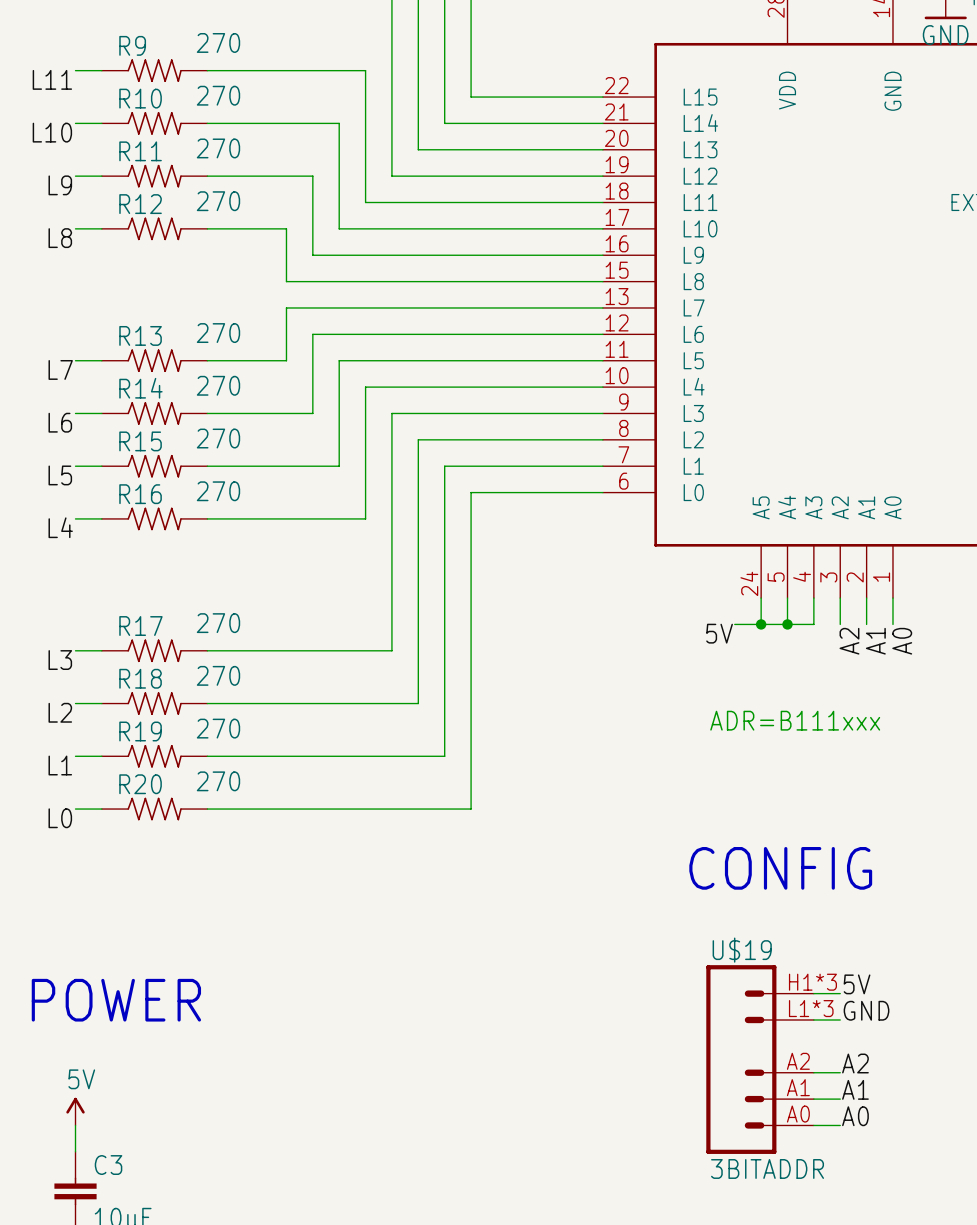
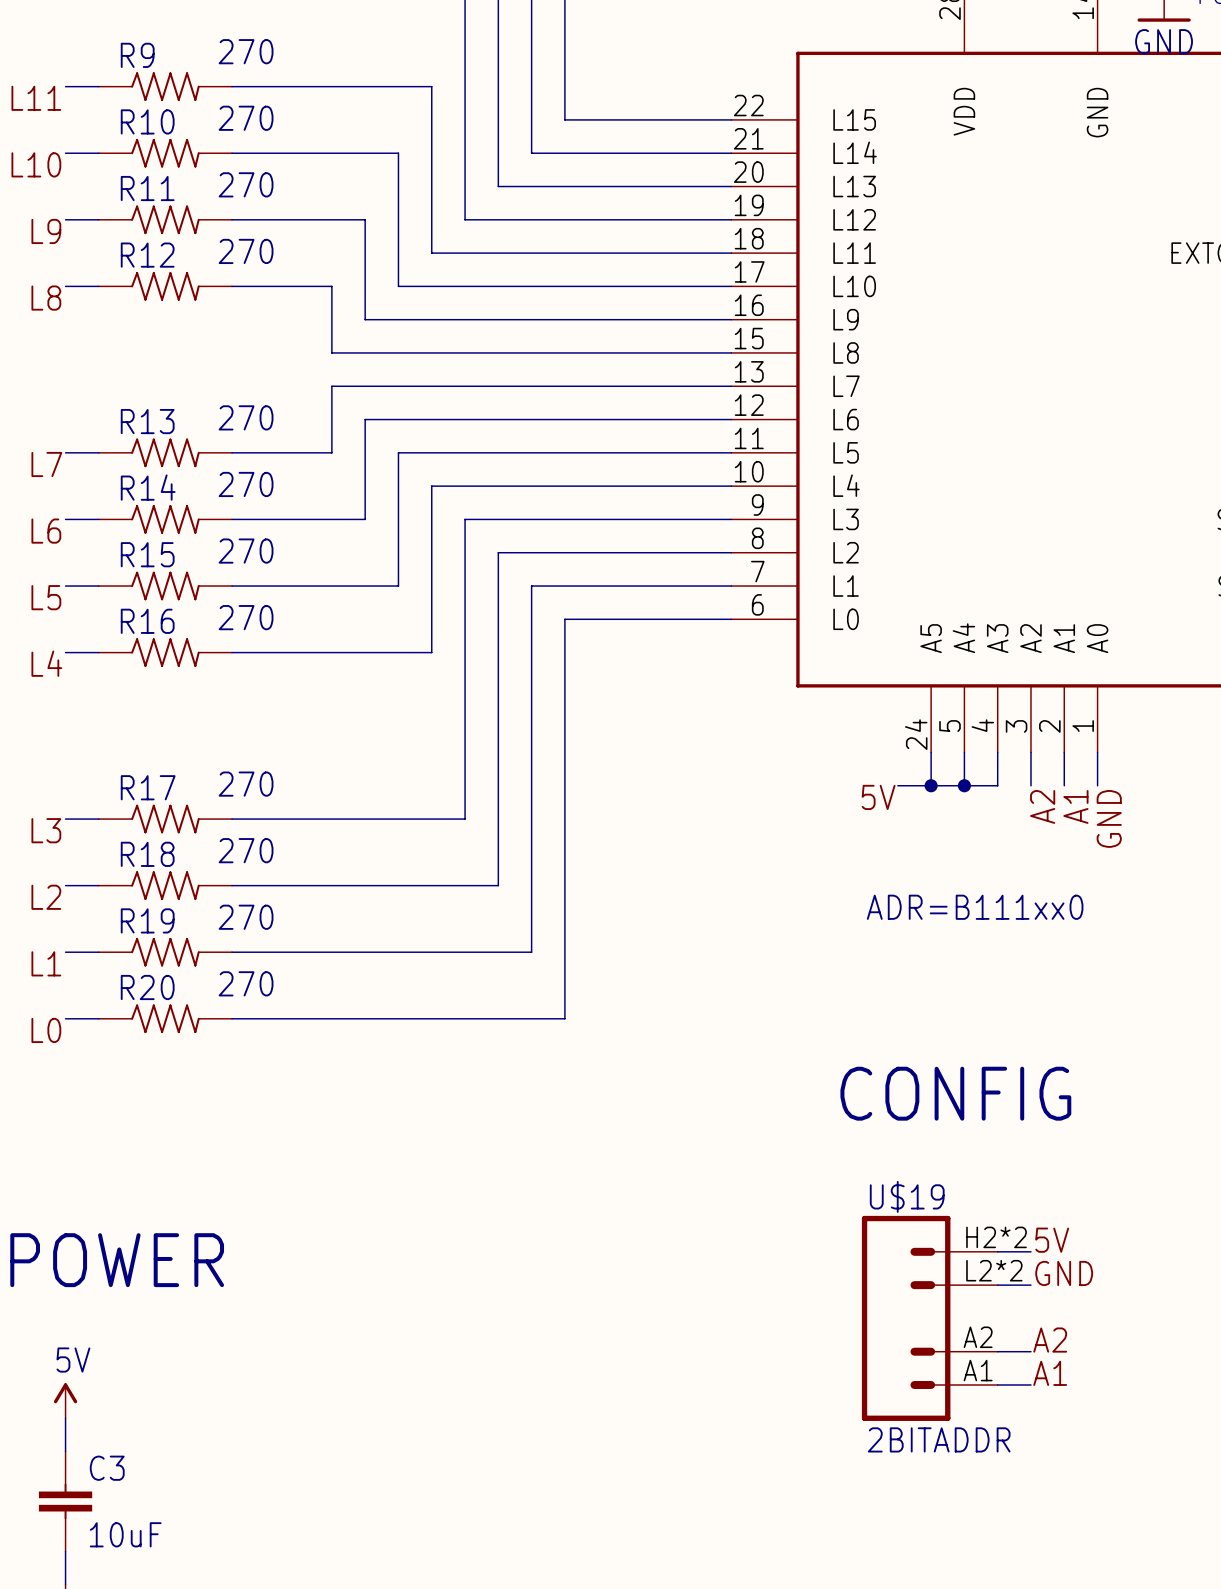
label: A0 (902, 641) -> GND (1109, 818)
text: ADR=B111xxx (795, 720) -> ADR=B111xx0 (975, 907)
U$19 symbol: [706, 965, 814, 1154] -> [861, 1215, 998, 1421]
label: A0 (855, 1116) -> none
wire: (813, 1125) (840, 1125) -> none
U$19 value: 3BITADDR (767, 1168) -> 2BITADDR (939, 1439)

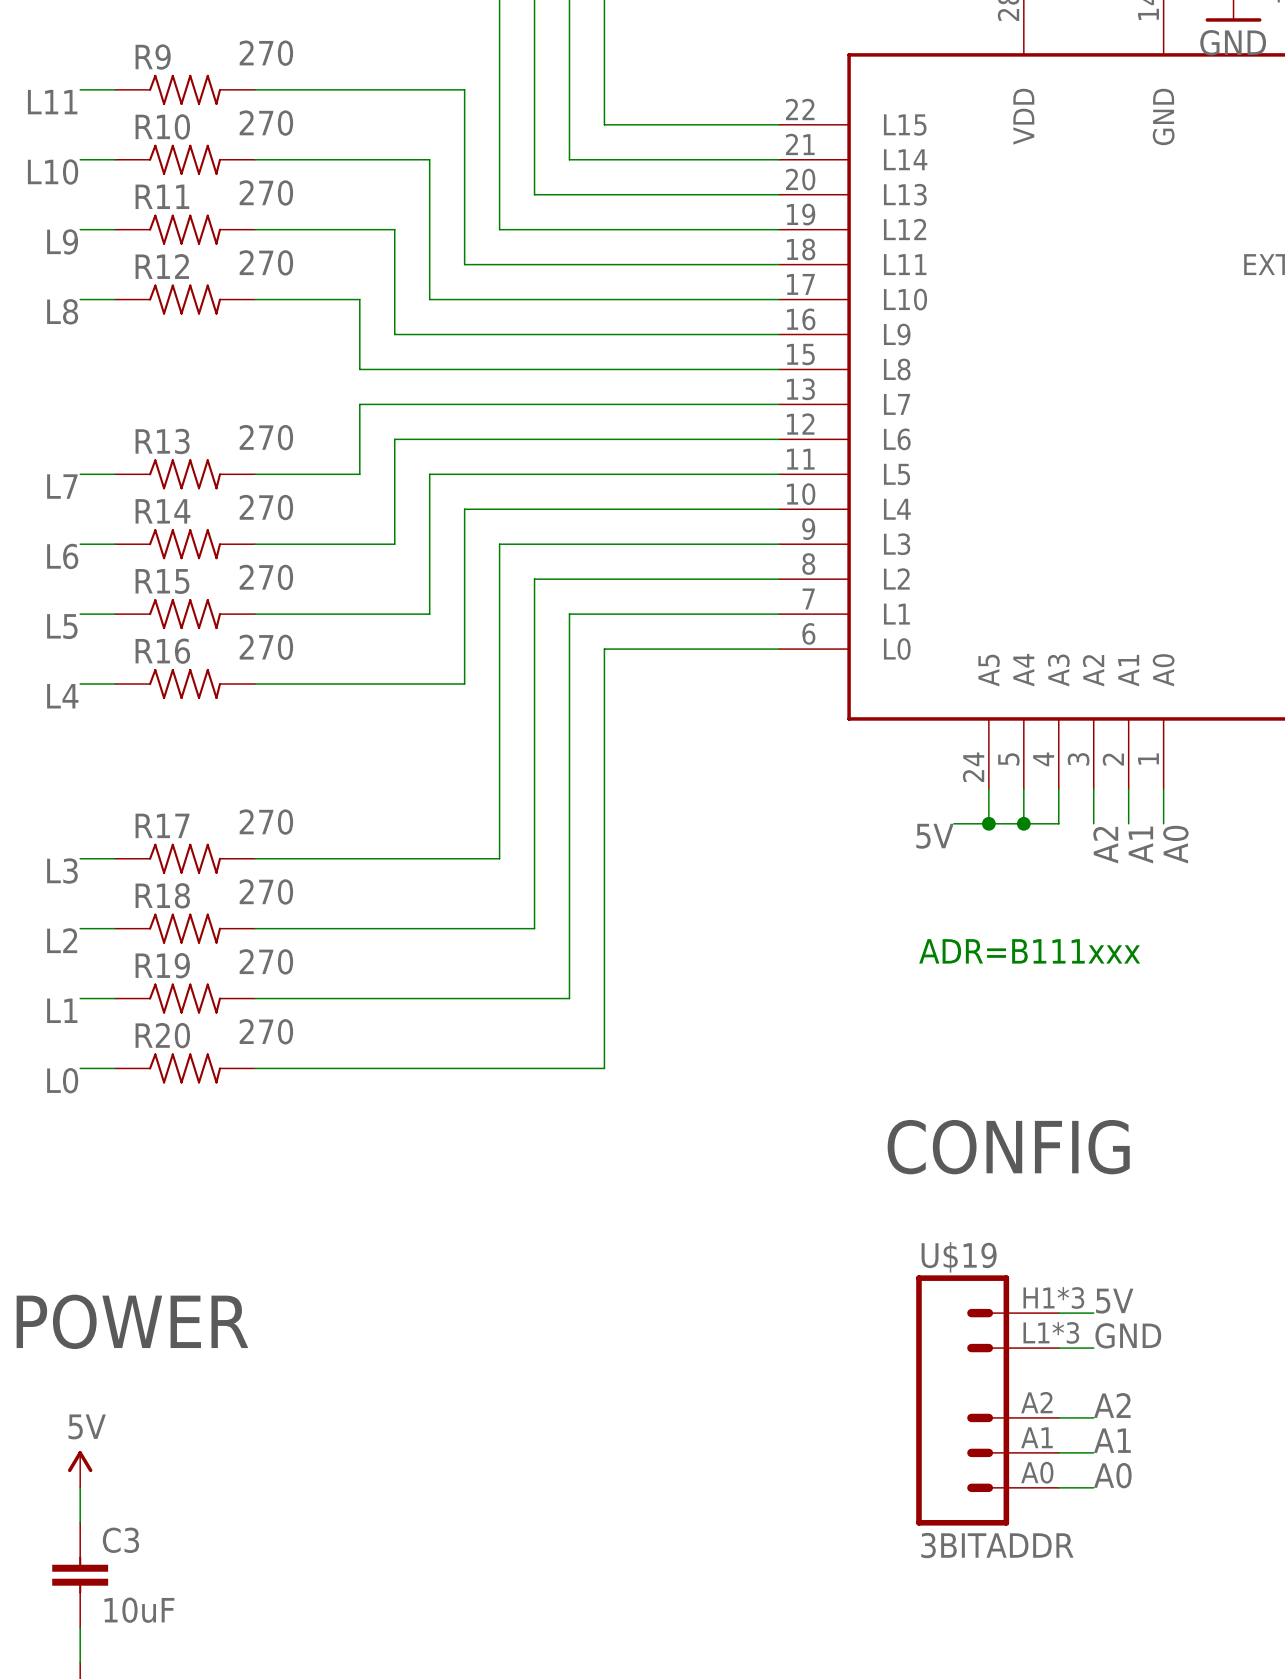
label: GND (1109, 818) -> A0 (1175, 844)
text: ADR=B111xx0 (975, 907) -> ADR=B111xxx (1029, 951)
U$19 symbol: [861, 1215, 998, 1421] -> [916, 1275, 1059, 1526]
label: none -> A0 (1112, 1475)
wire: none -> (1058, 1487) (1093, 1487)
U$19 value: 2BITADDR (939, 1439) -> 3BITADDR (997, 1545)

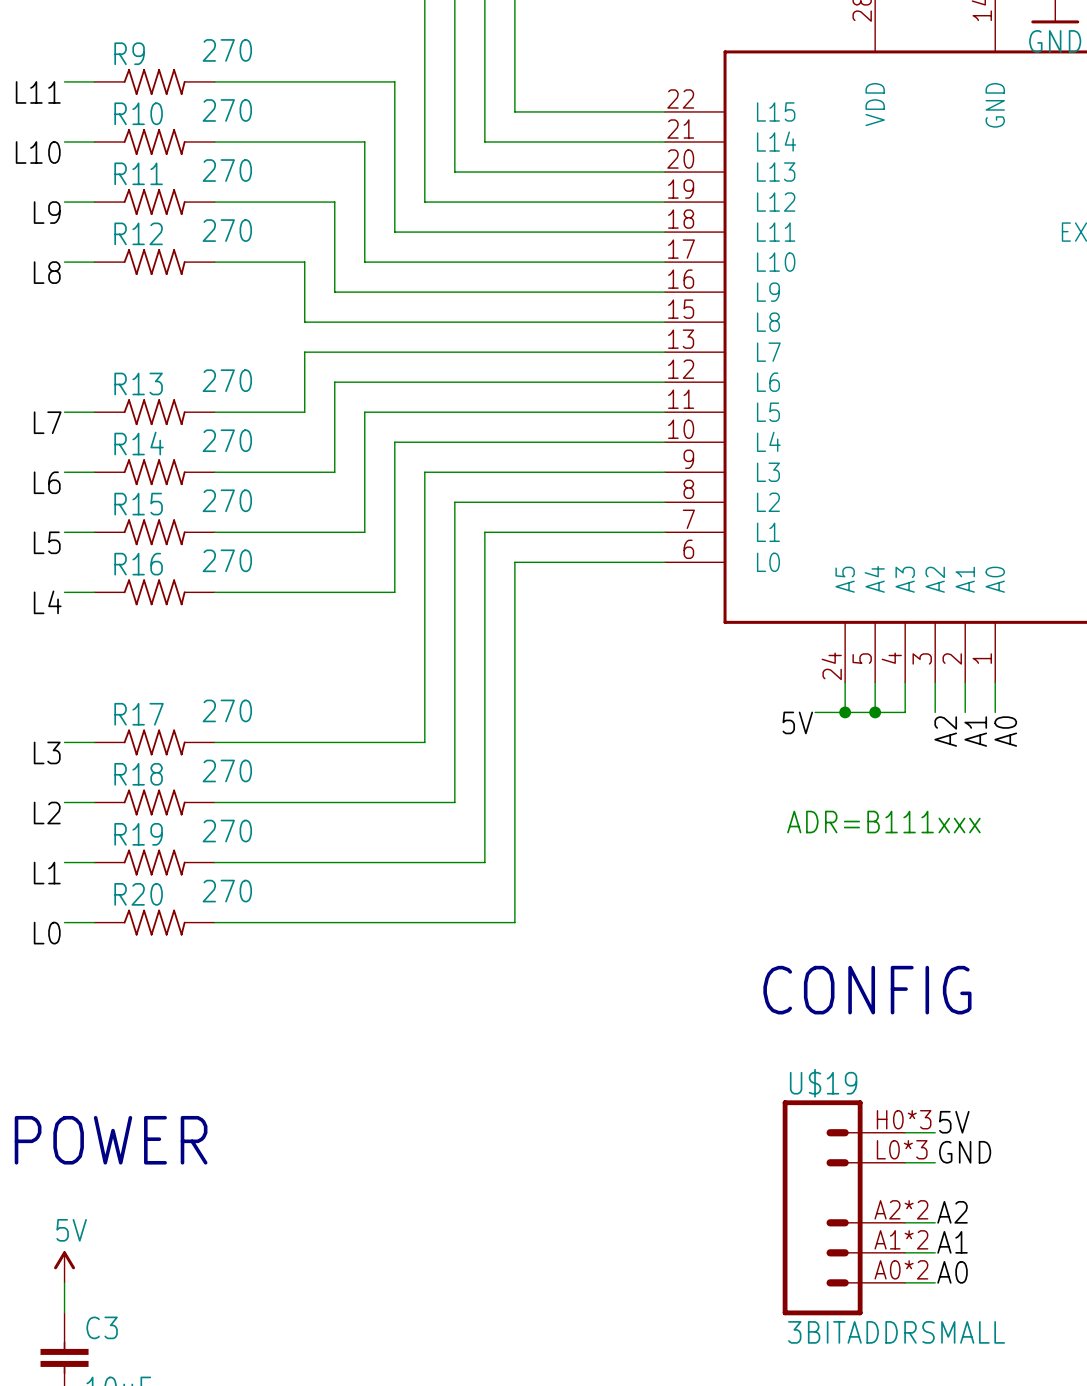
U$19 pin number: H1*3 (1053, 1297) -> H0*3 (904, 1119)
U$19 pin number: L1*3 (1051, 1332) -> L0*3 (902, 1149)
U$19 pin number: A2 (1036, 1402) -> A2*2 (901, 1209)
U$19 pin number: A1 (1036, 1437) -> A1*2 (901, 1239)
U$19 pin number: A0 (1037, 1472) -> A0*2 (901, 1269)
U$19 value: 3BITADDR (997, 1545) -> 3BITADDRSMALL (896, 1332)

